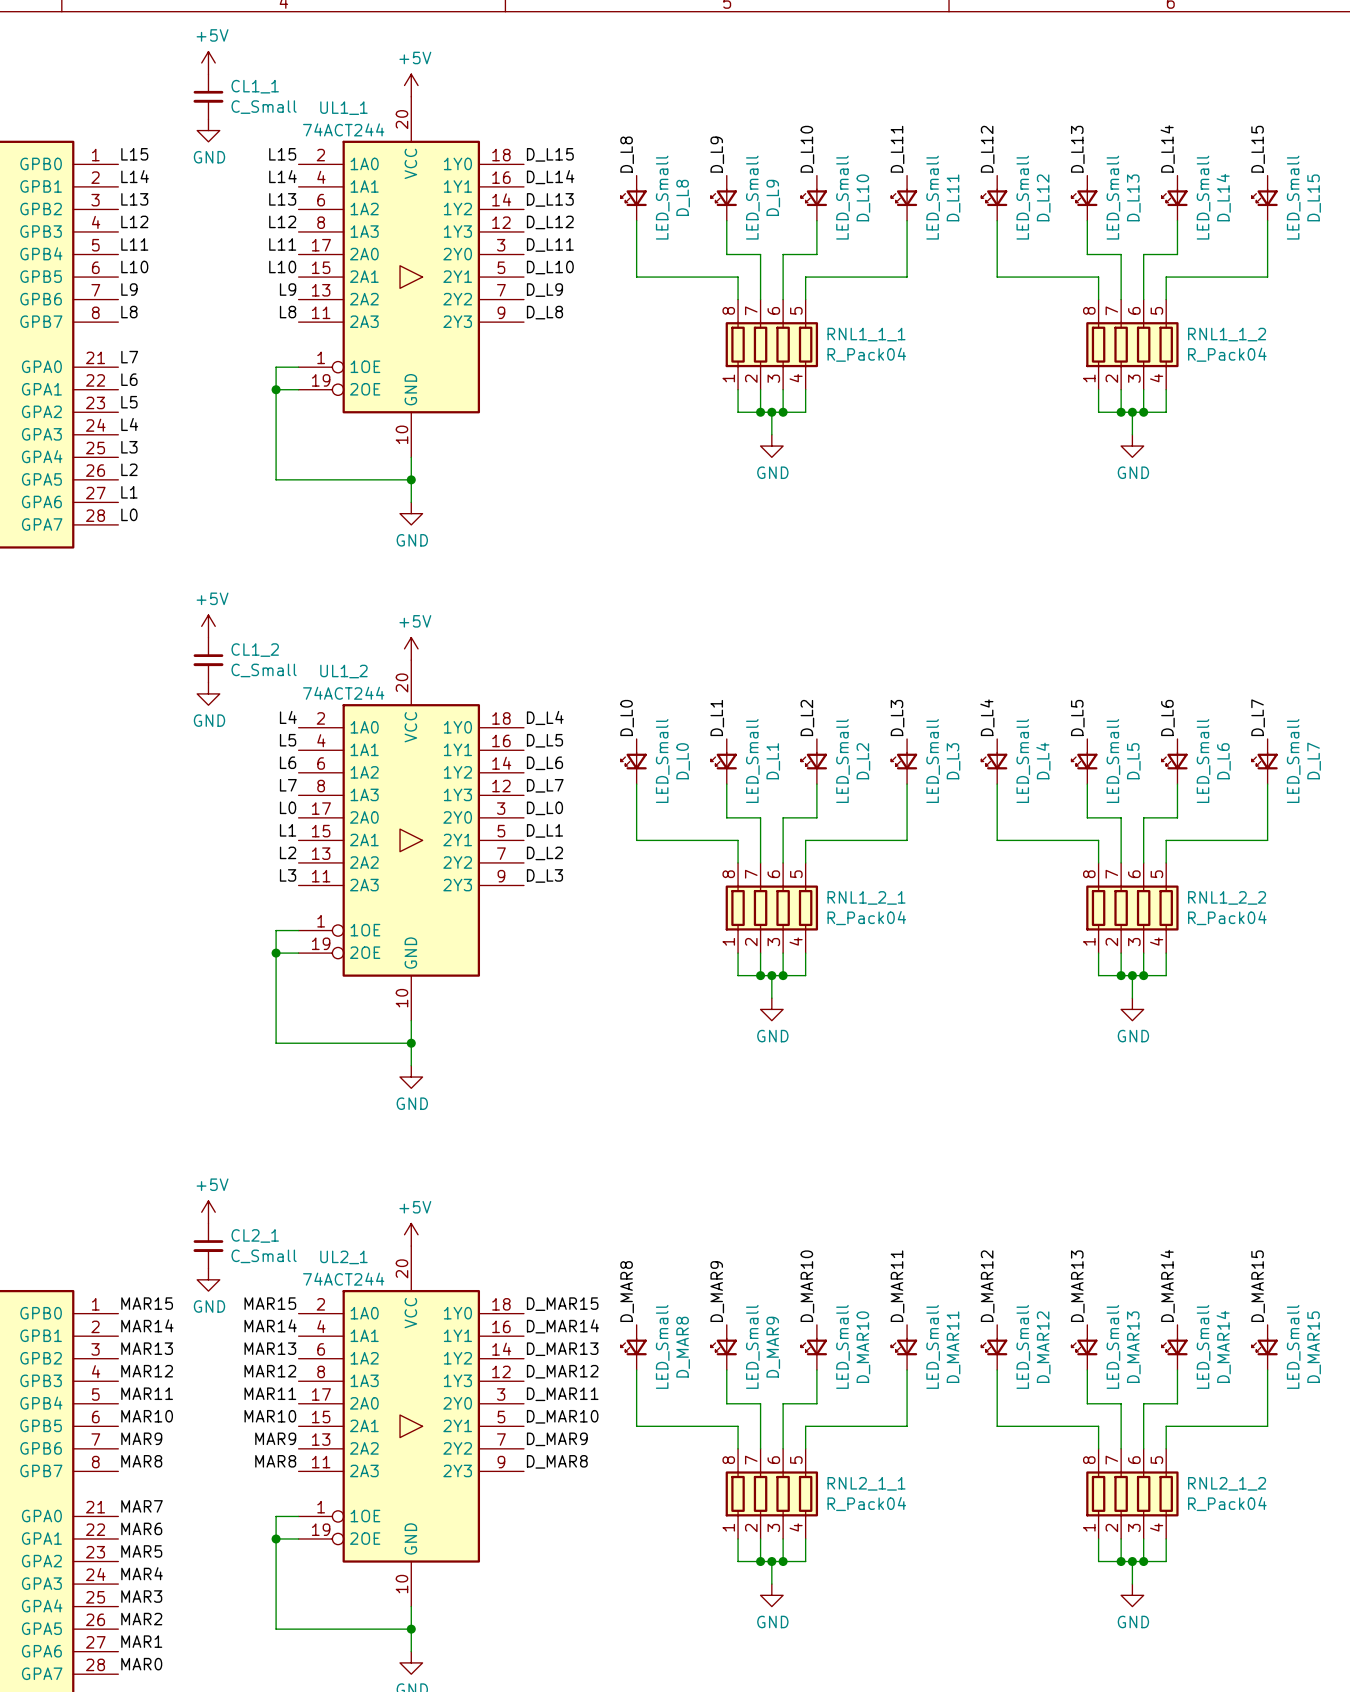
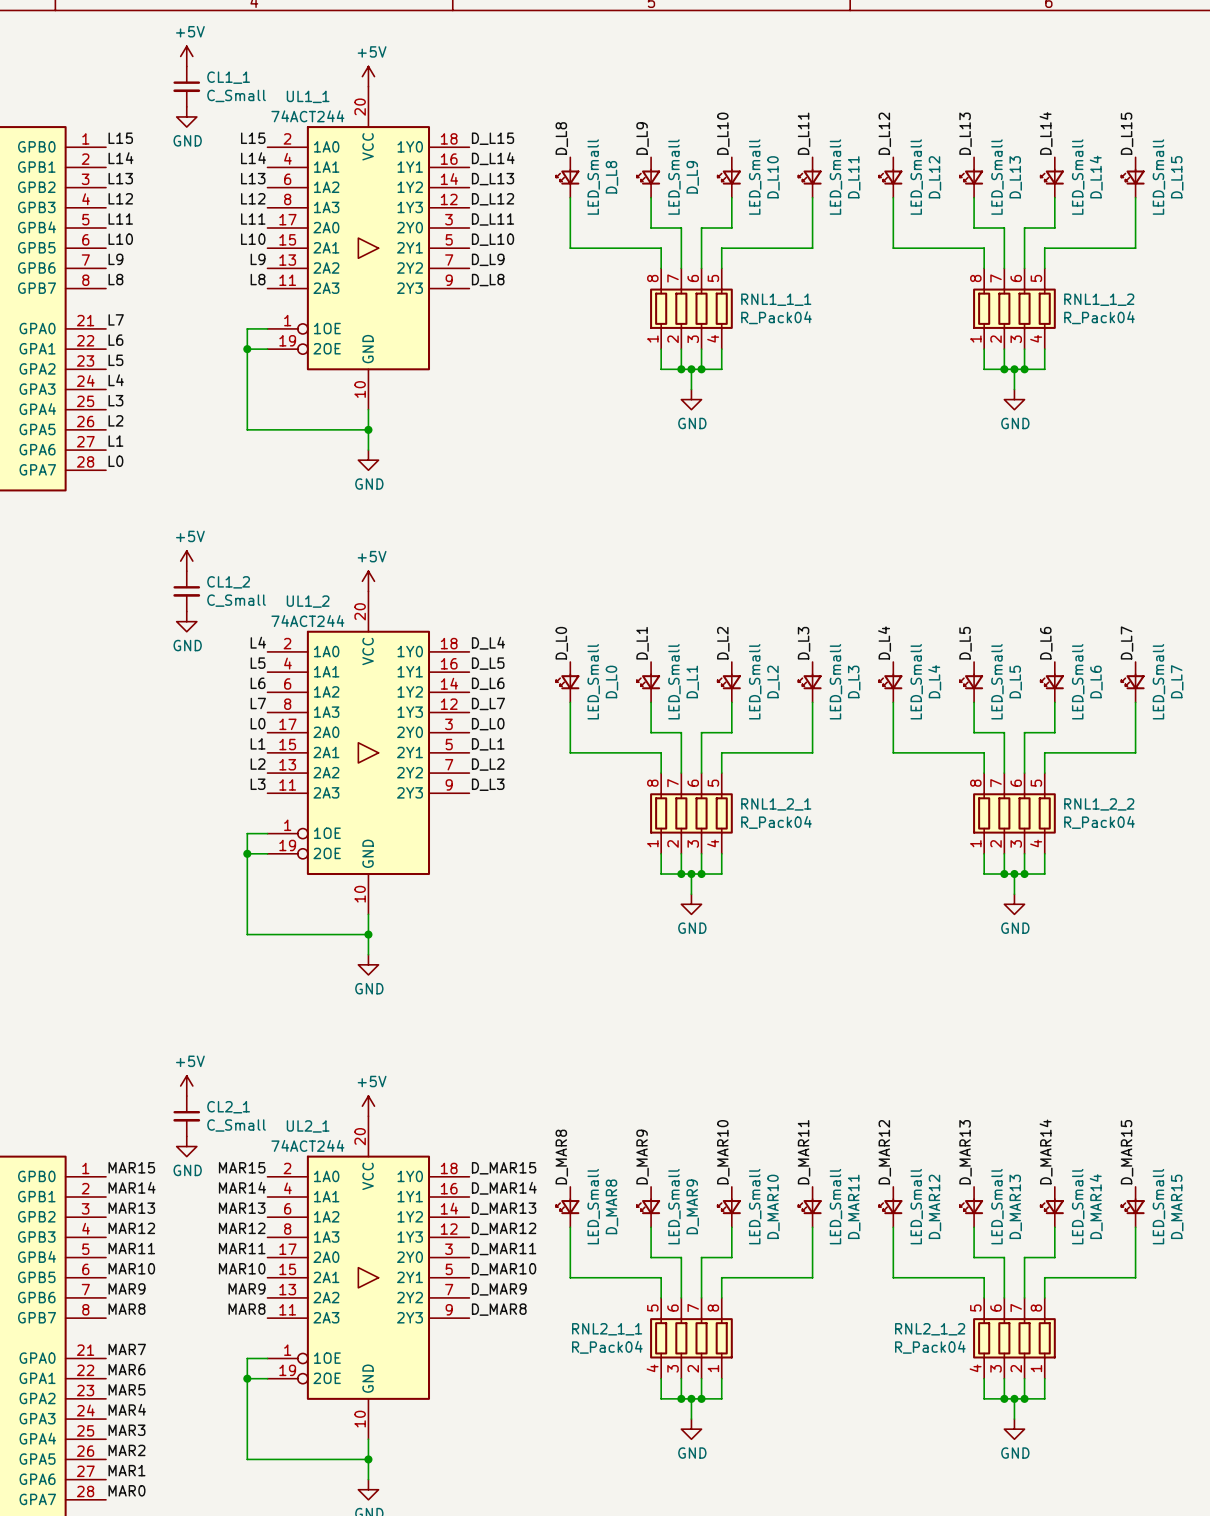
RNL2_1_1 flip: as is (771, 1493) -> left-right (691, 1338)
RNL2_1_2 flip: as is (1132, 1493) -> left-right (1014, 1338)

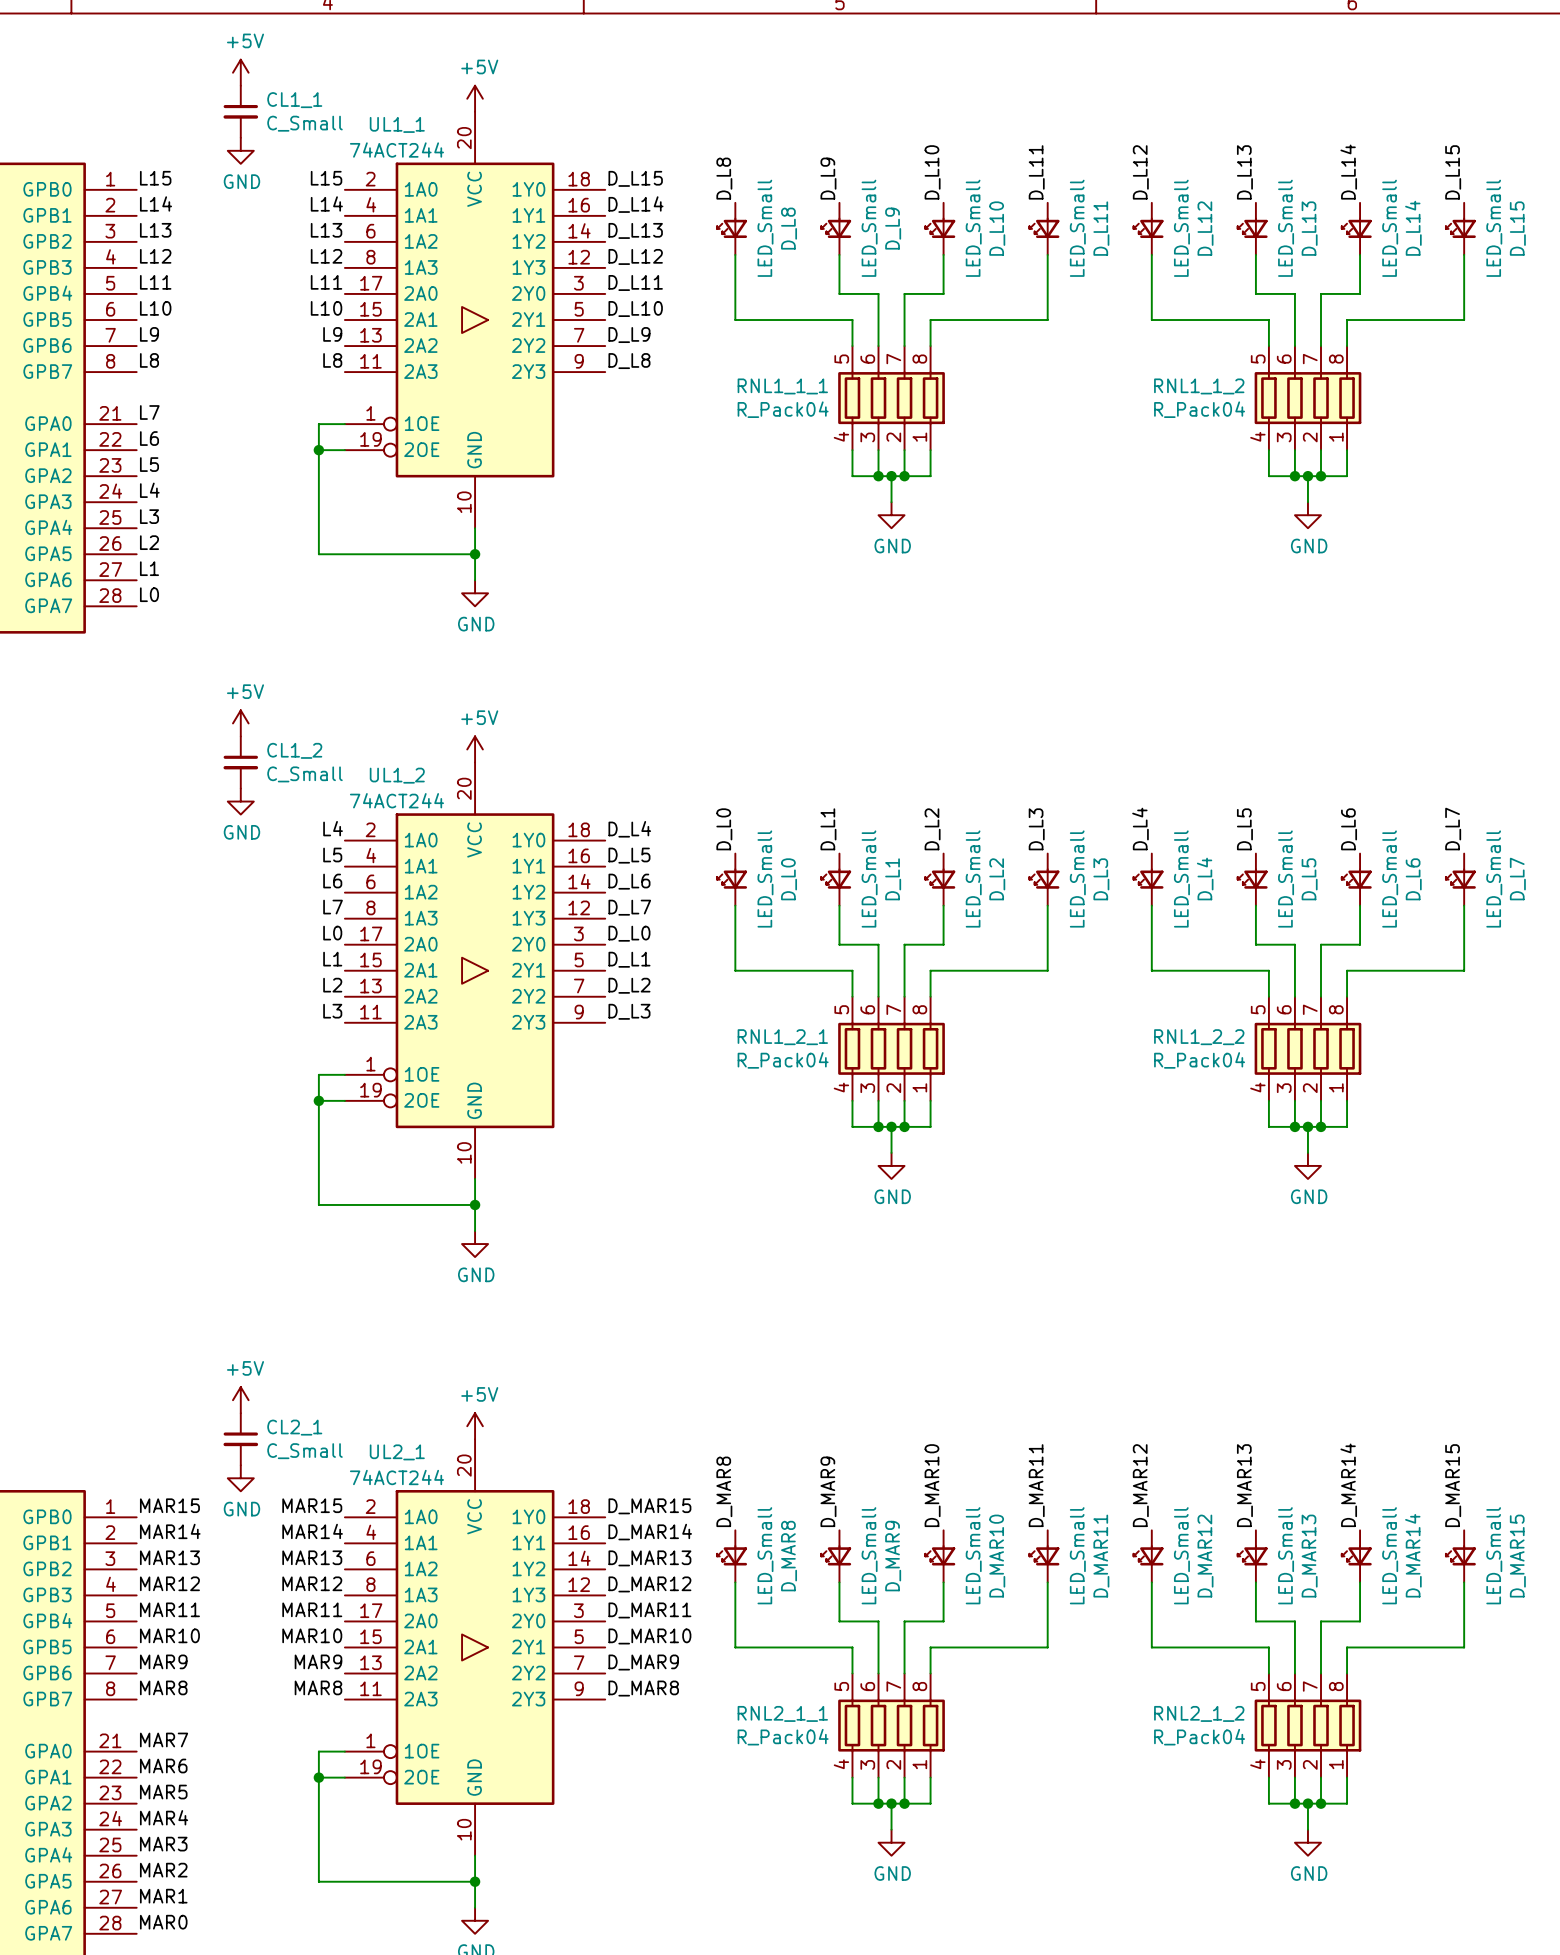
RNL1_1_1 flip: as is (691, 308) -> left-right (891, 398)
RNL1_1_2 flip: as is (1014, 308) -> left-right (1307, 398)
RNL1_2_1 flip: as is (691, 813) -> left-right (891, 1048)
RNL1_2_2 flip: as is (1014, 813) -> left-right (1307, 1048)

